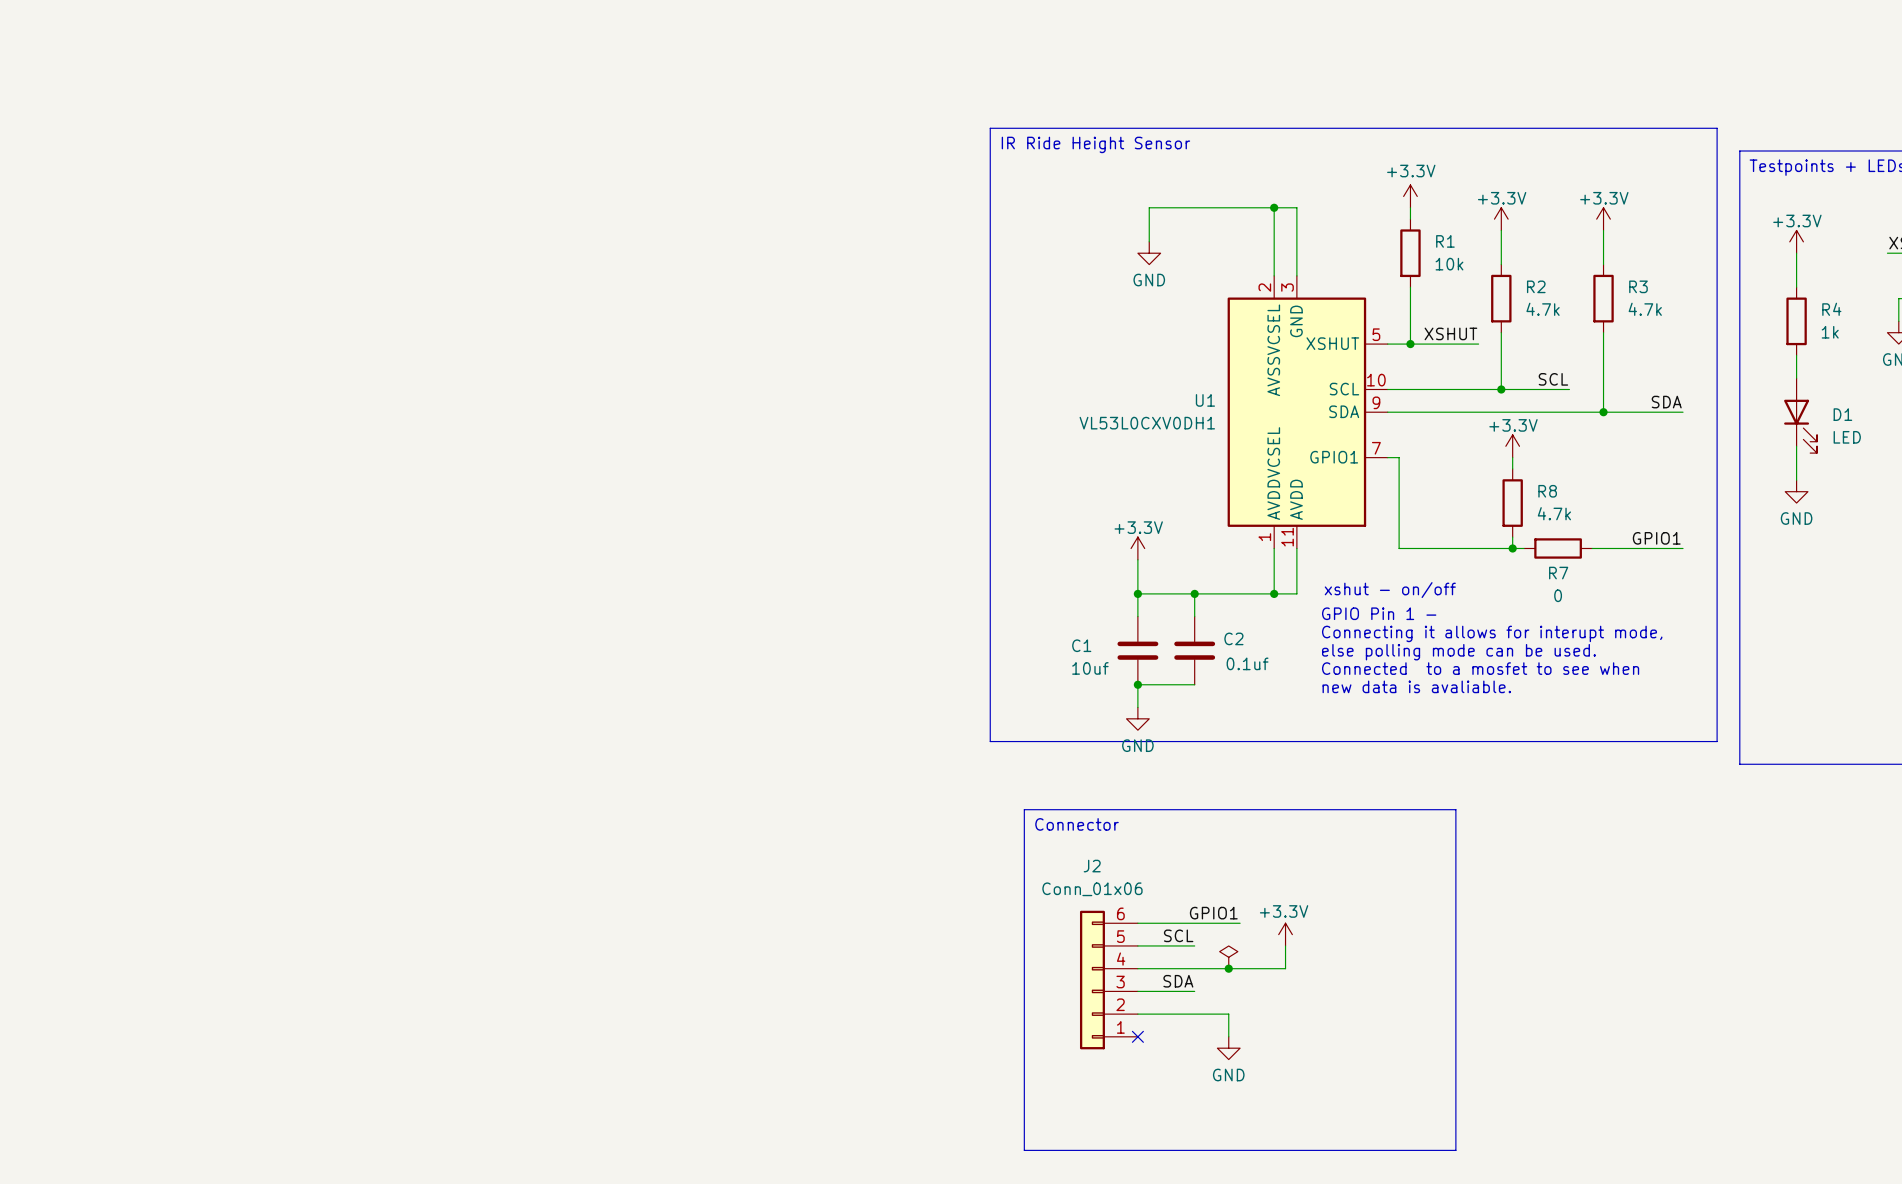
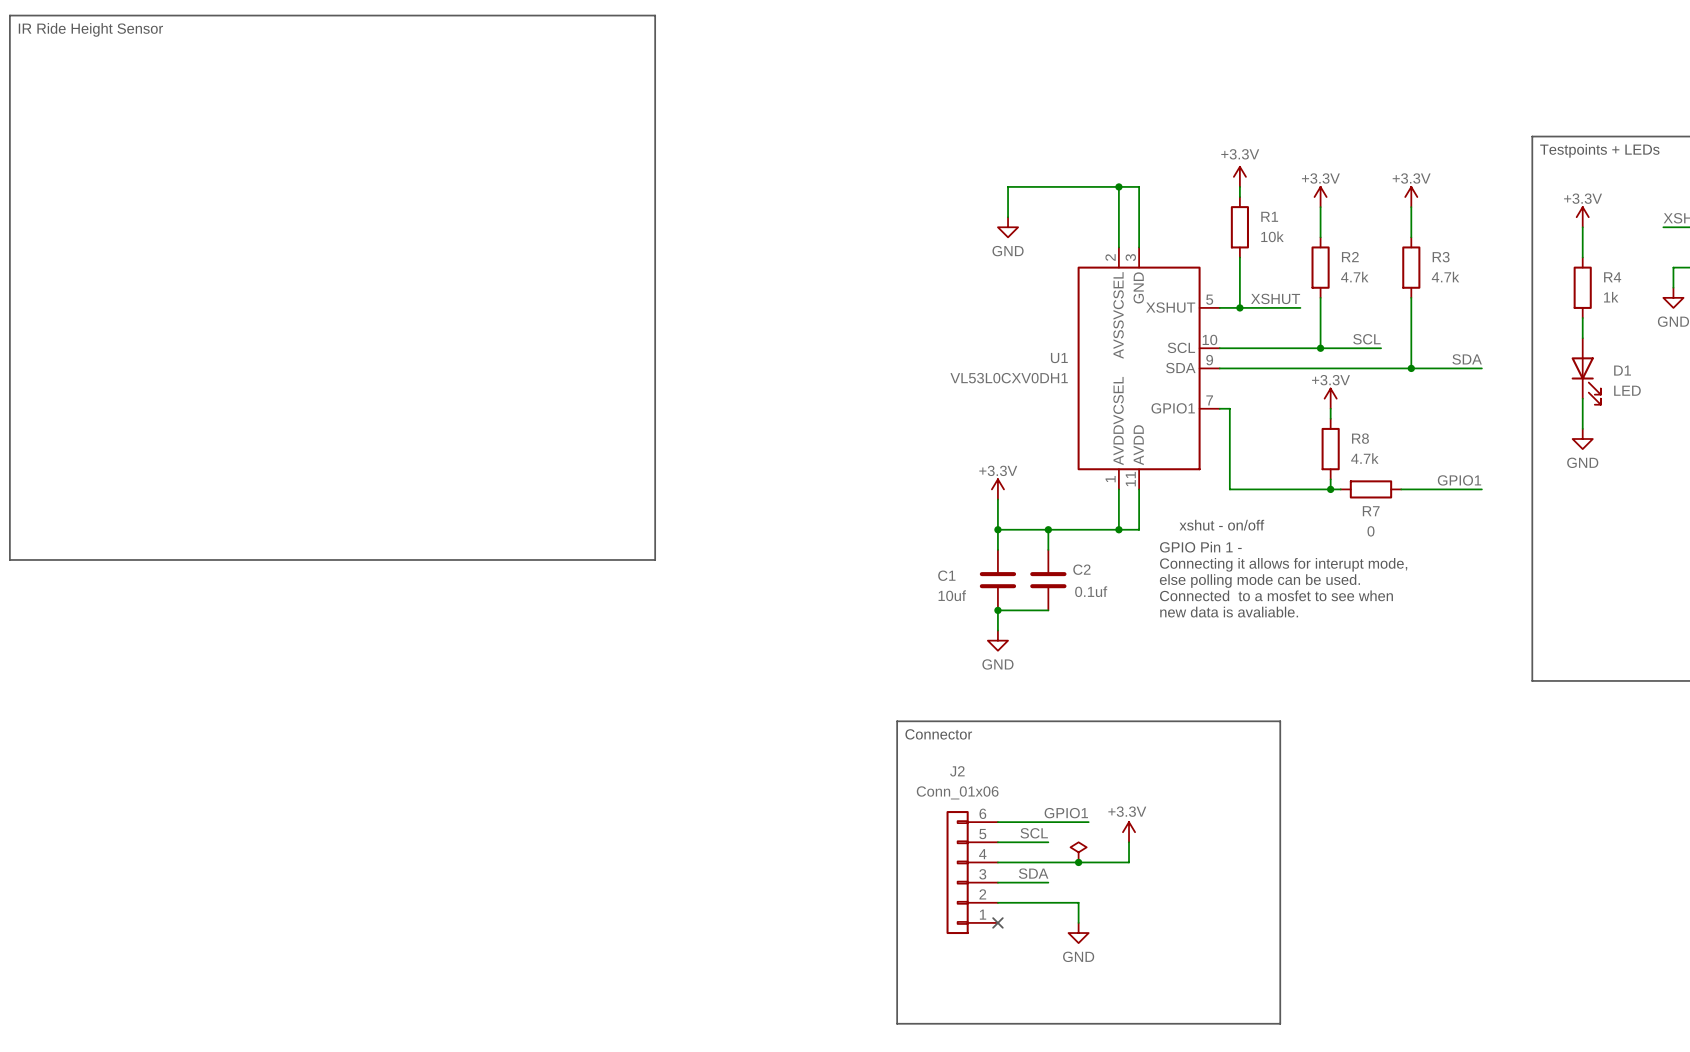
line: none -> (9, 15) (655, 15) (655, 559) (9, 559) (9, 15)
text: none -> IR Ride Height Sensor (90, 29)
line: (990, 128) (1717, 128) (1717, 741) (990, 741) (990, 128) -> none
text: IR Ride Height Sensor (1095, 144) -> none

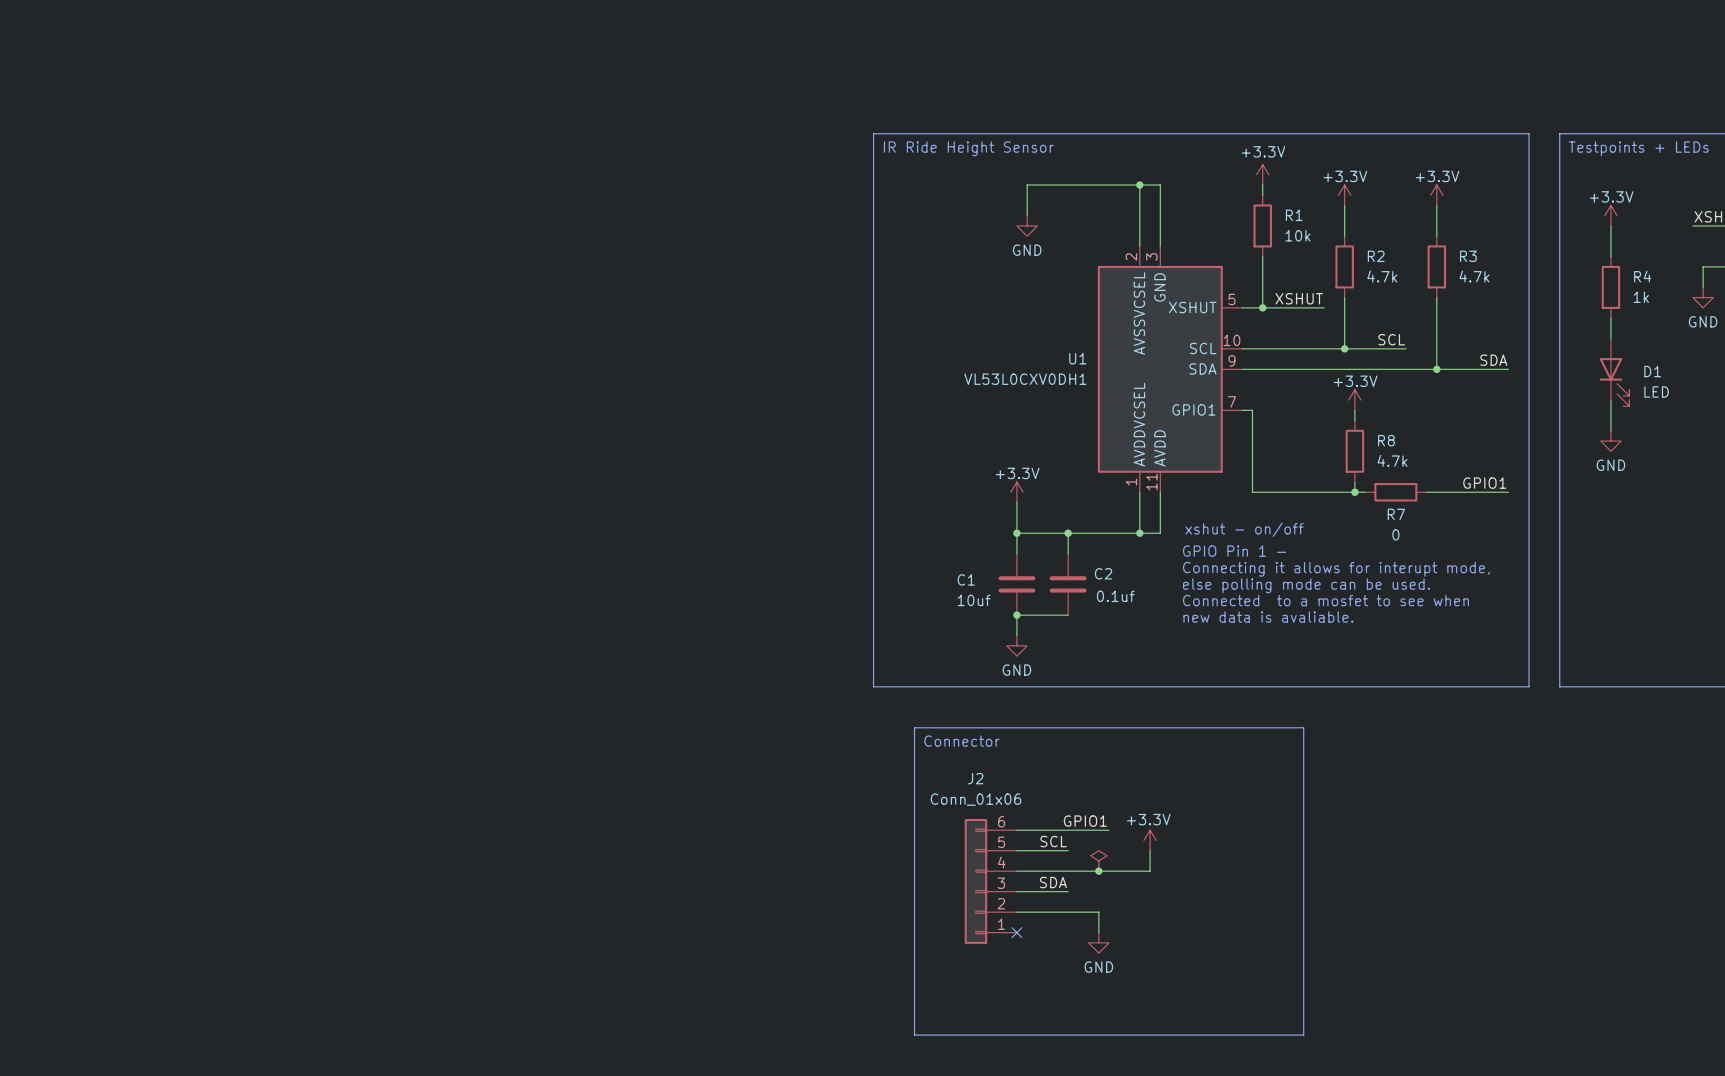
line: (9, 15) (655, 15) (655, 559) (9, 559) (9, 15) -> none
text: IR Ride Height Sensor (90, 29) -> none
line: none -> (873, 133) (1529, 133) (1529, 686) (873, 686) (873, 133)
text: none -> IR Ride Height Sensor (968, 148)

